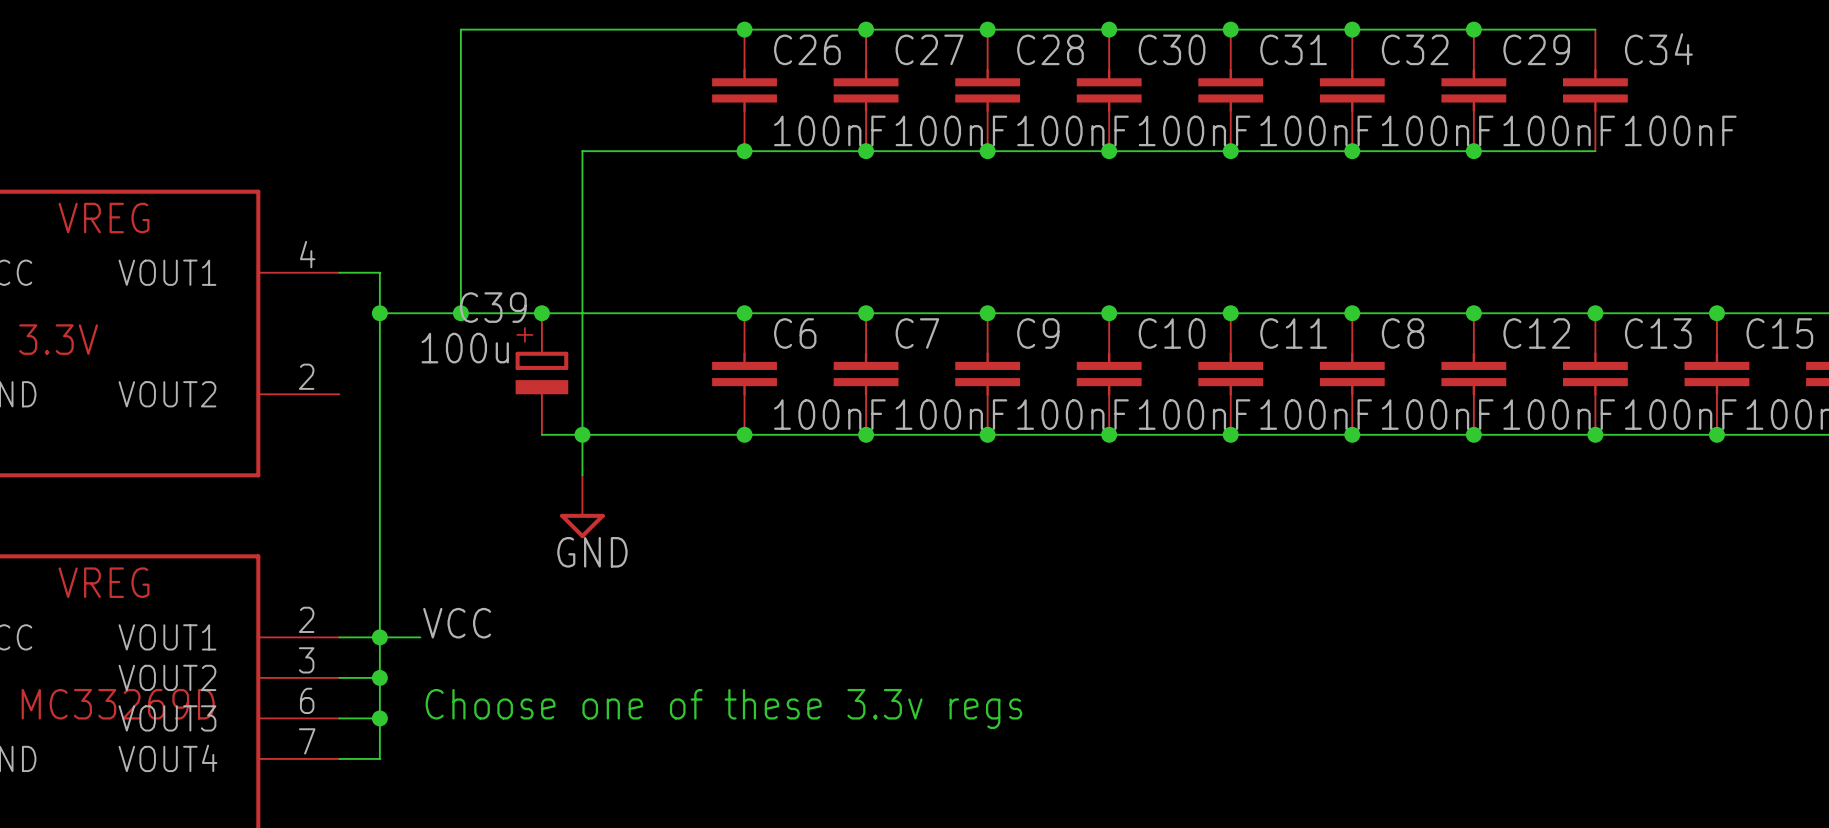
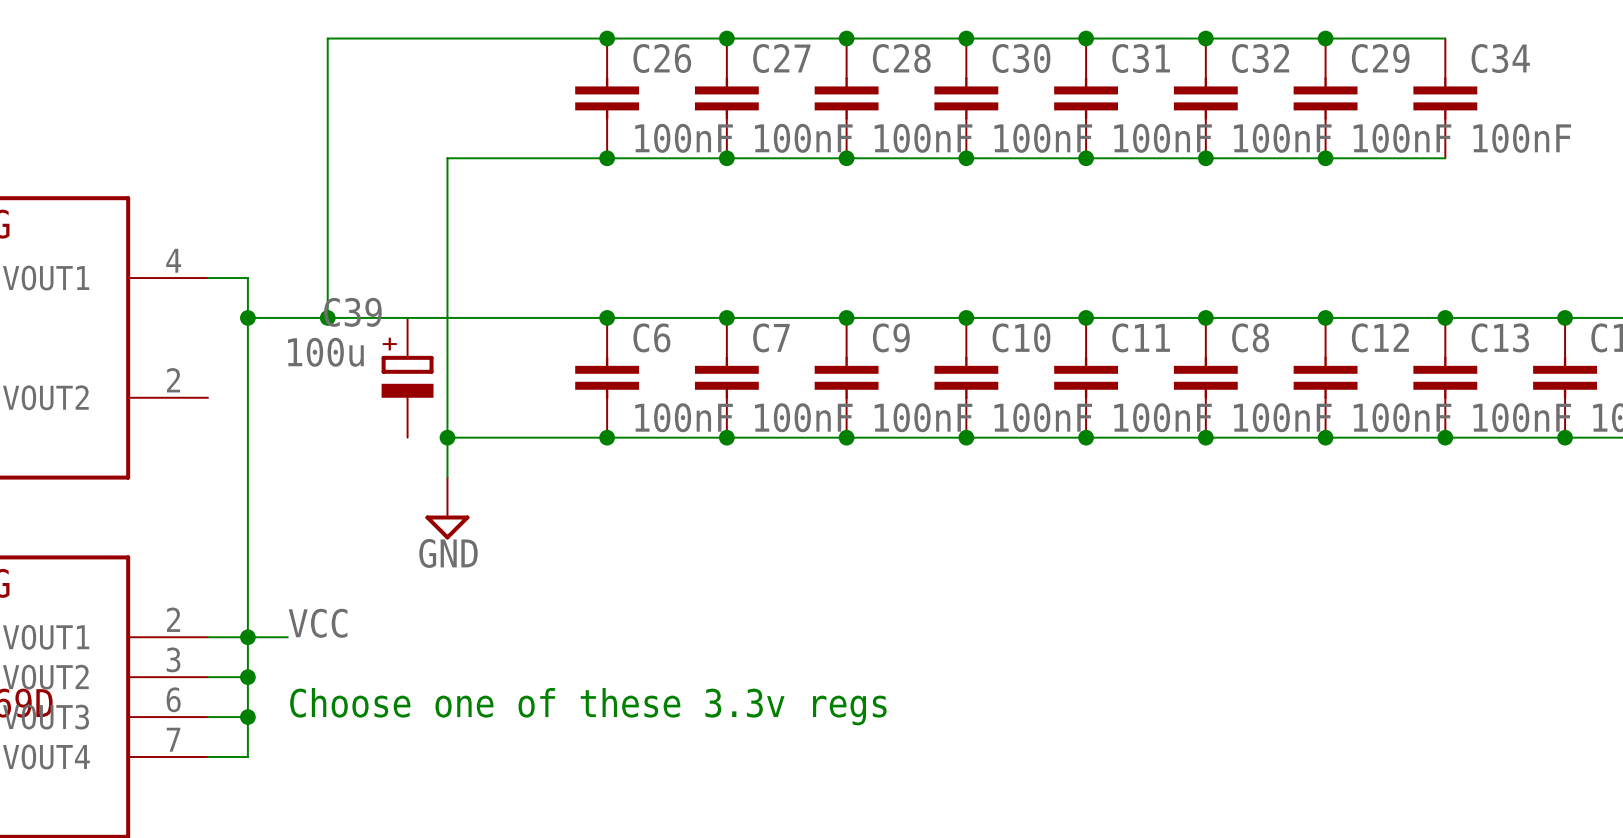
junction: (541, 313) -> none
wire: (541, 434) (582, 434) -> none

